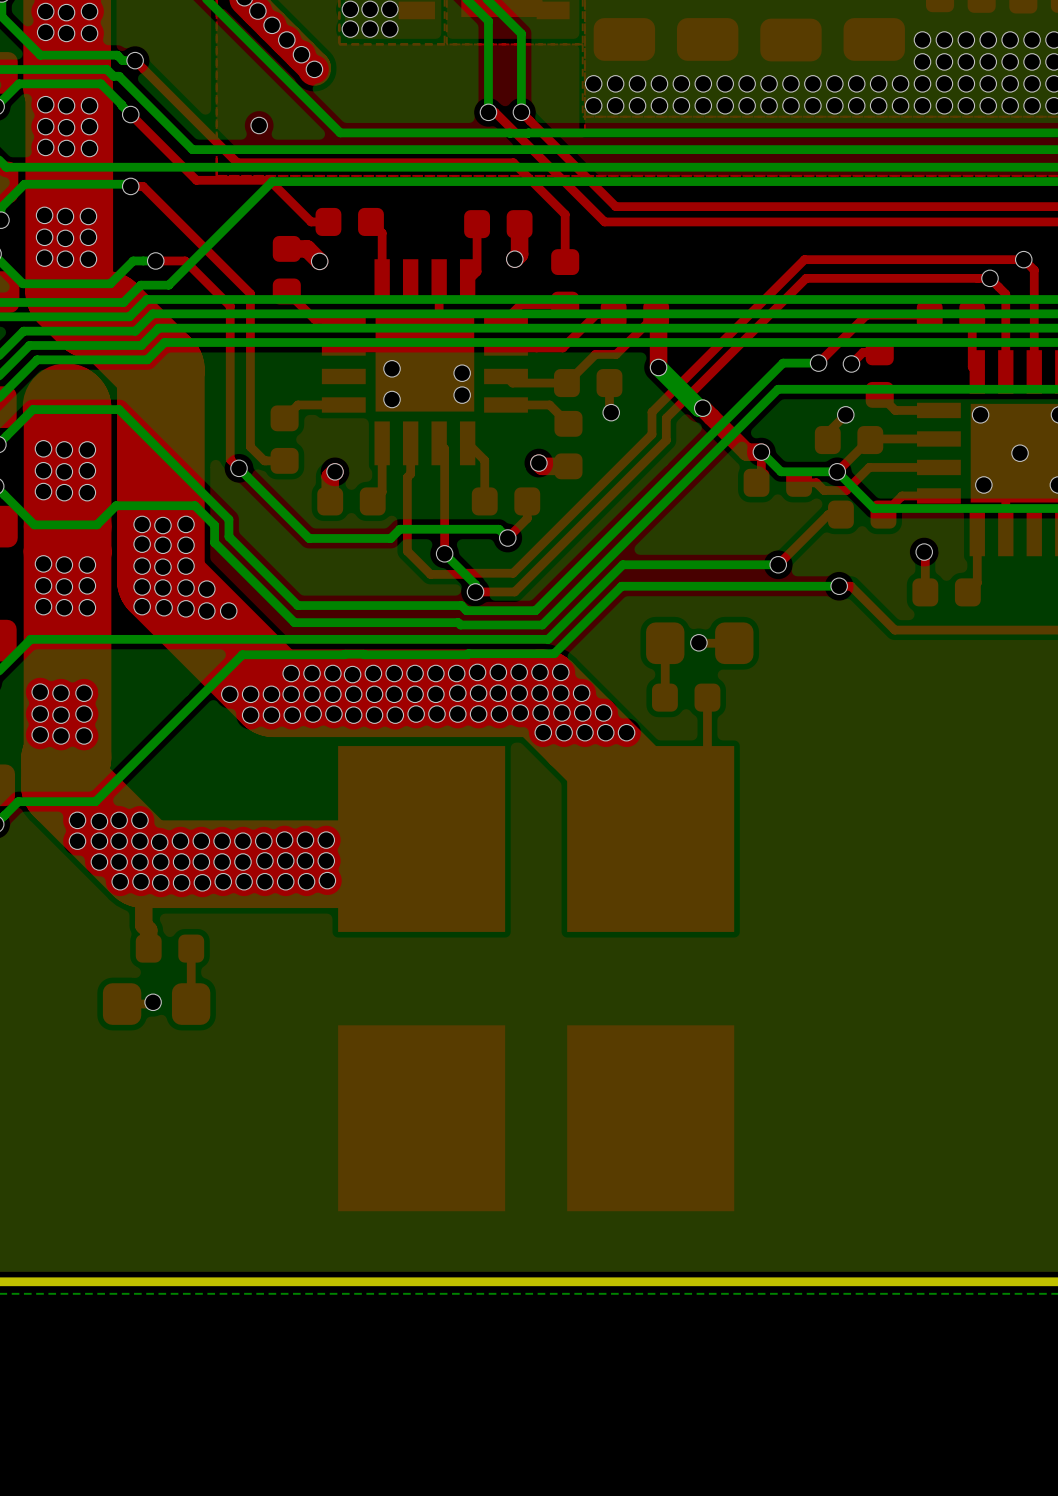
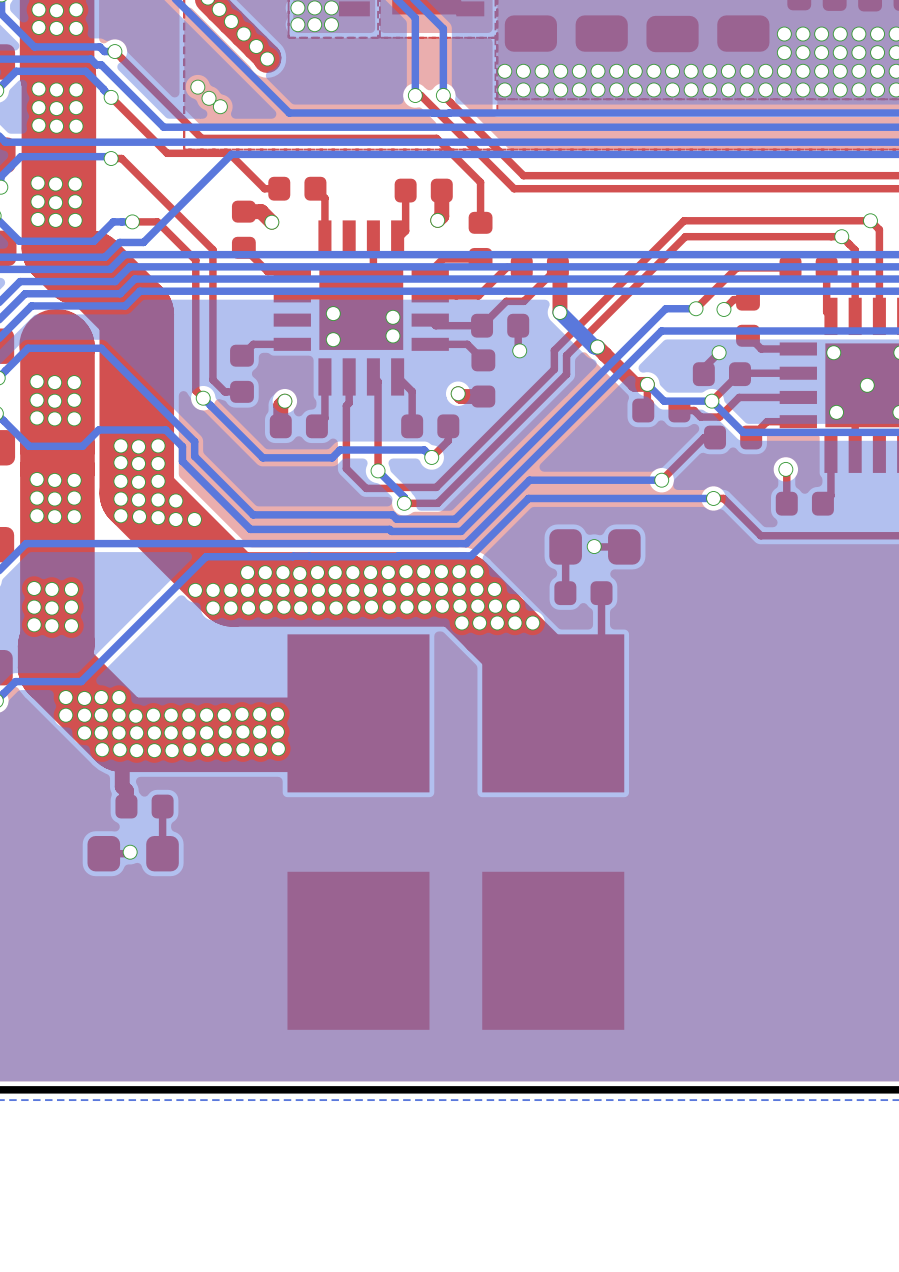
via: none -> (197, 87)
via: none -> (209, 98)

